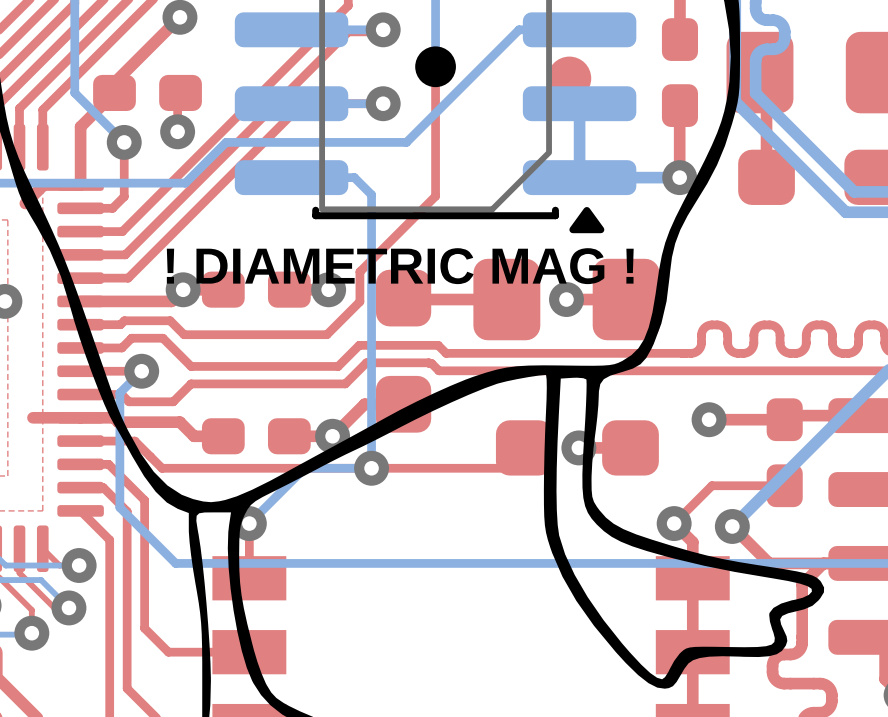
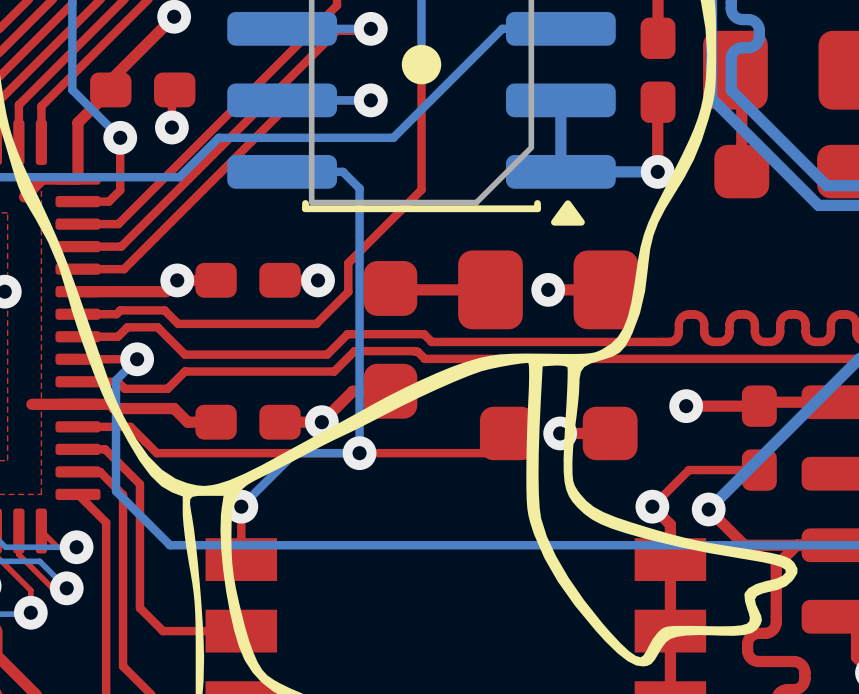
part: (569, 78) -> none
text: ! DIAMETRIC MAG ! (400, 266) -> none

